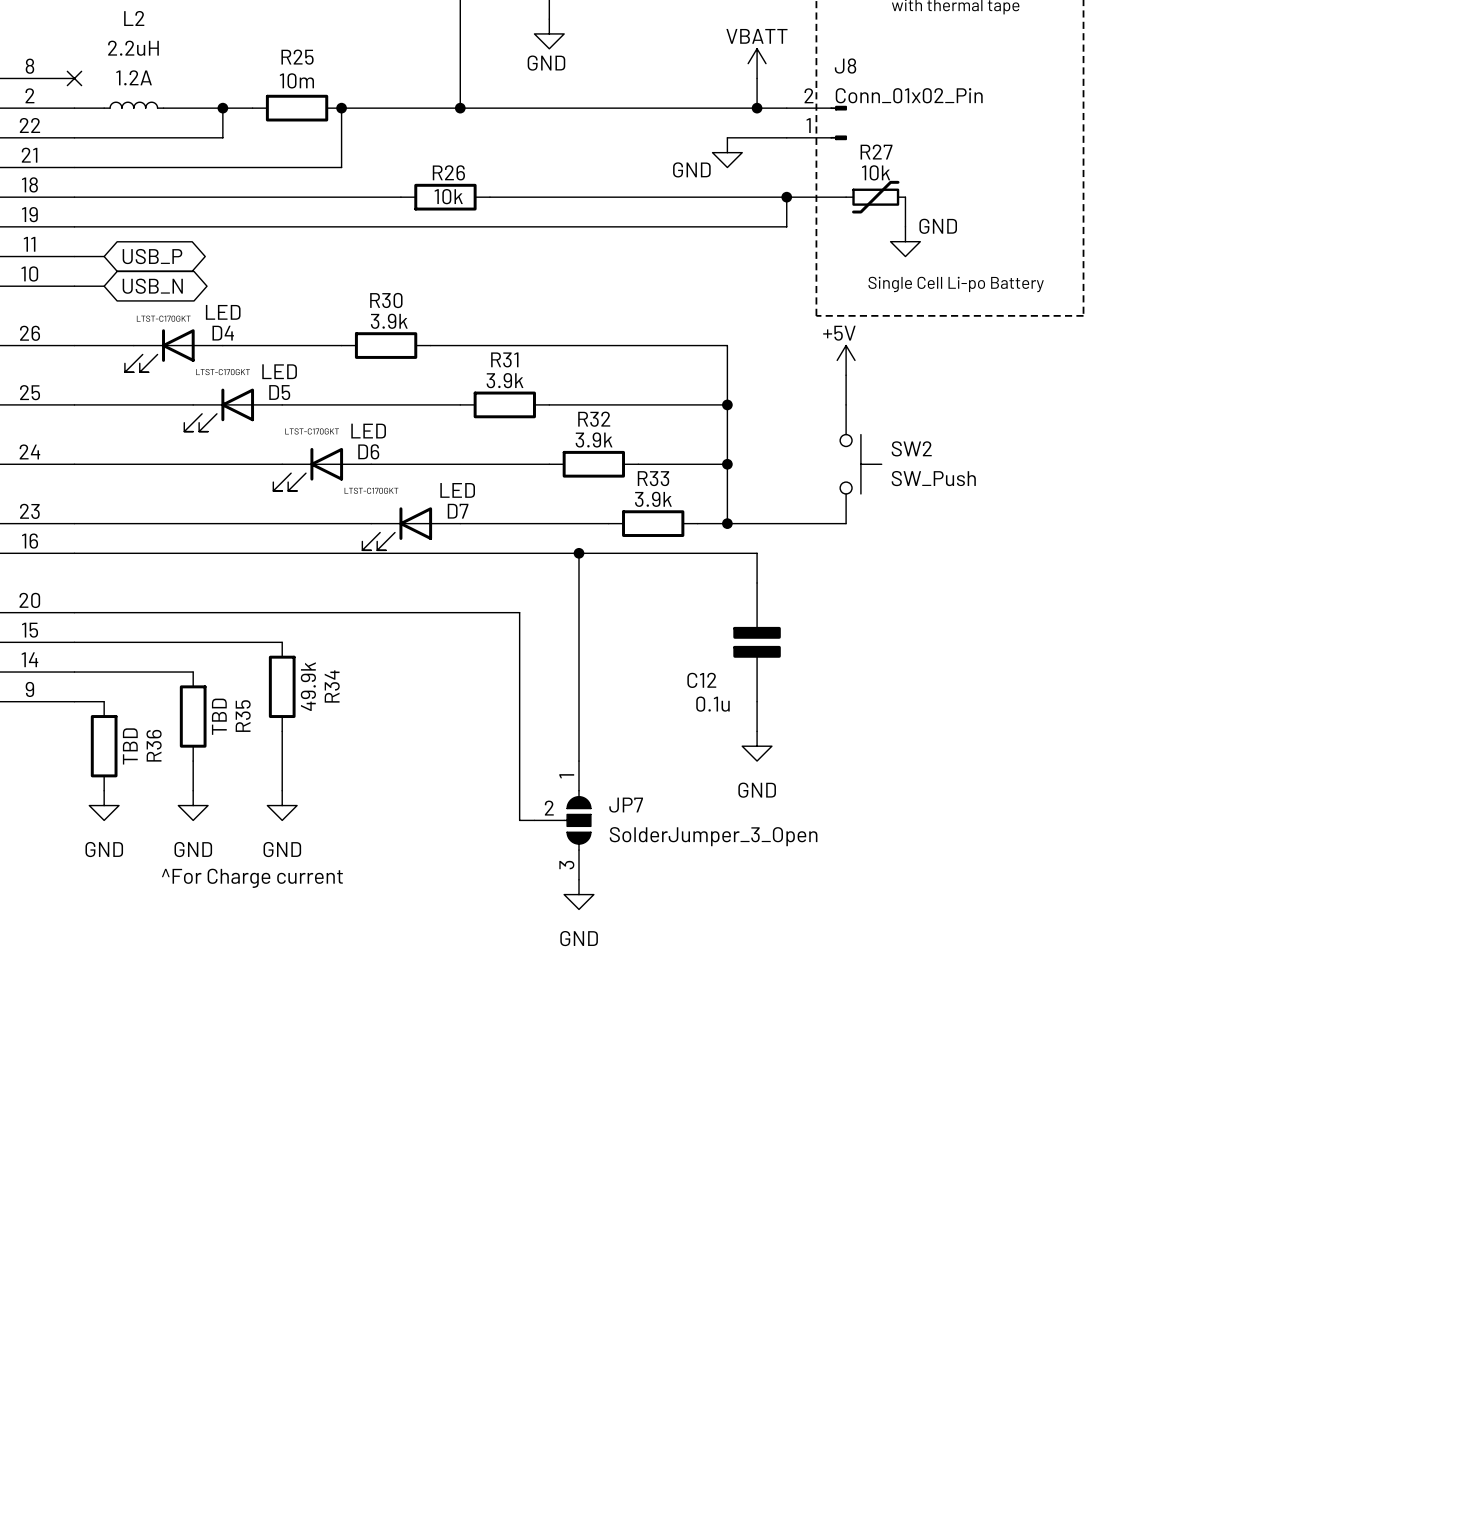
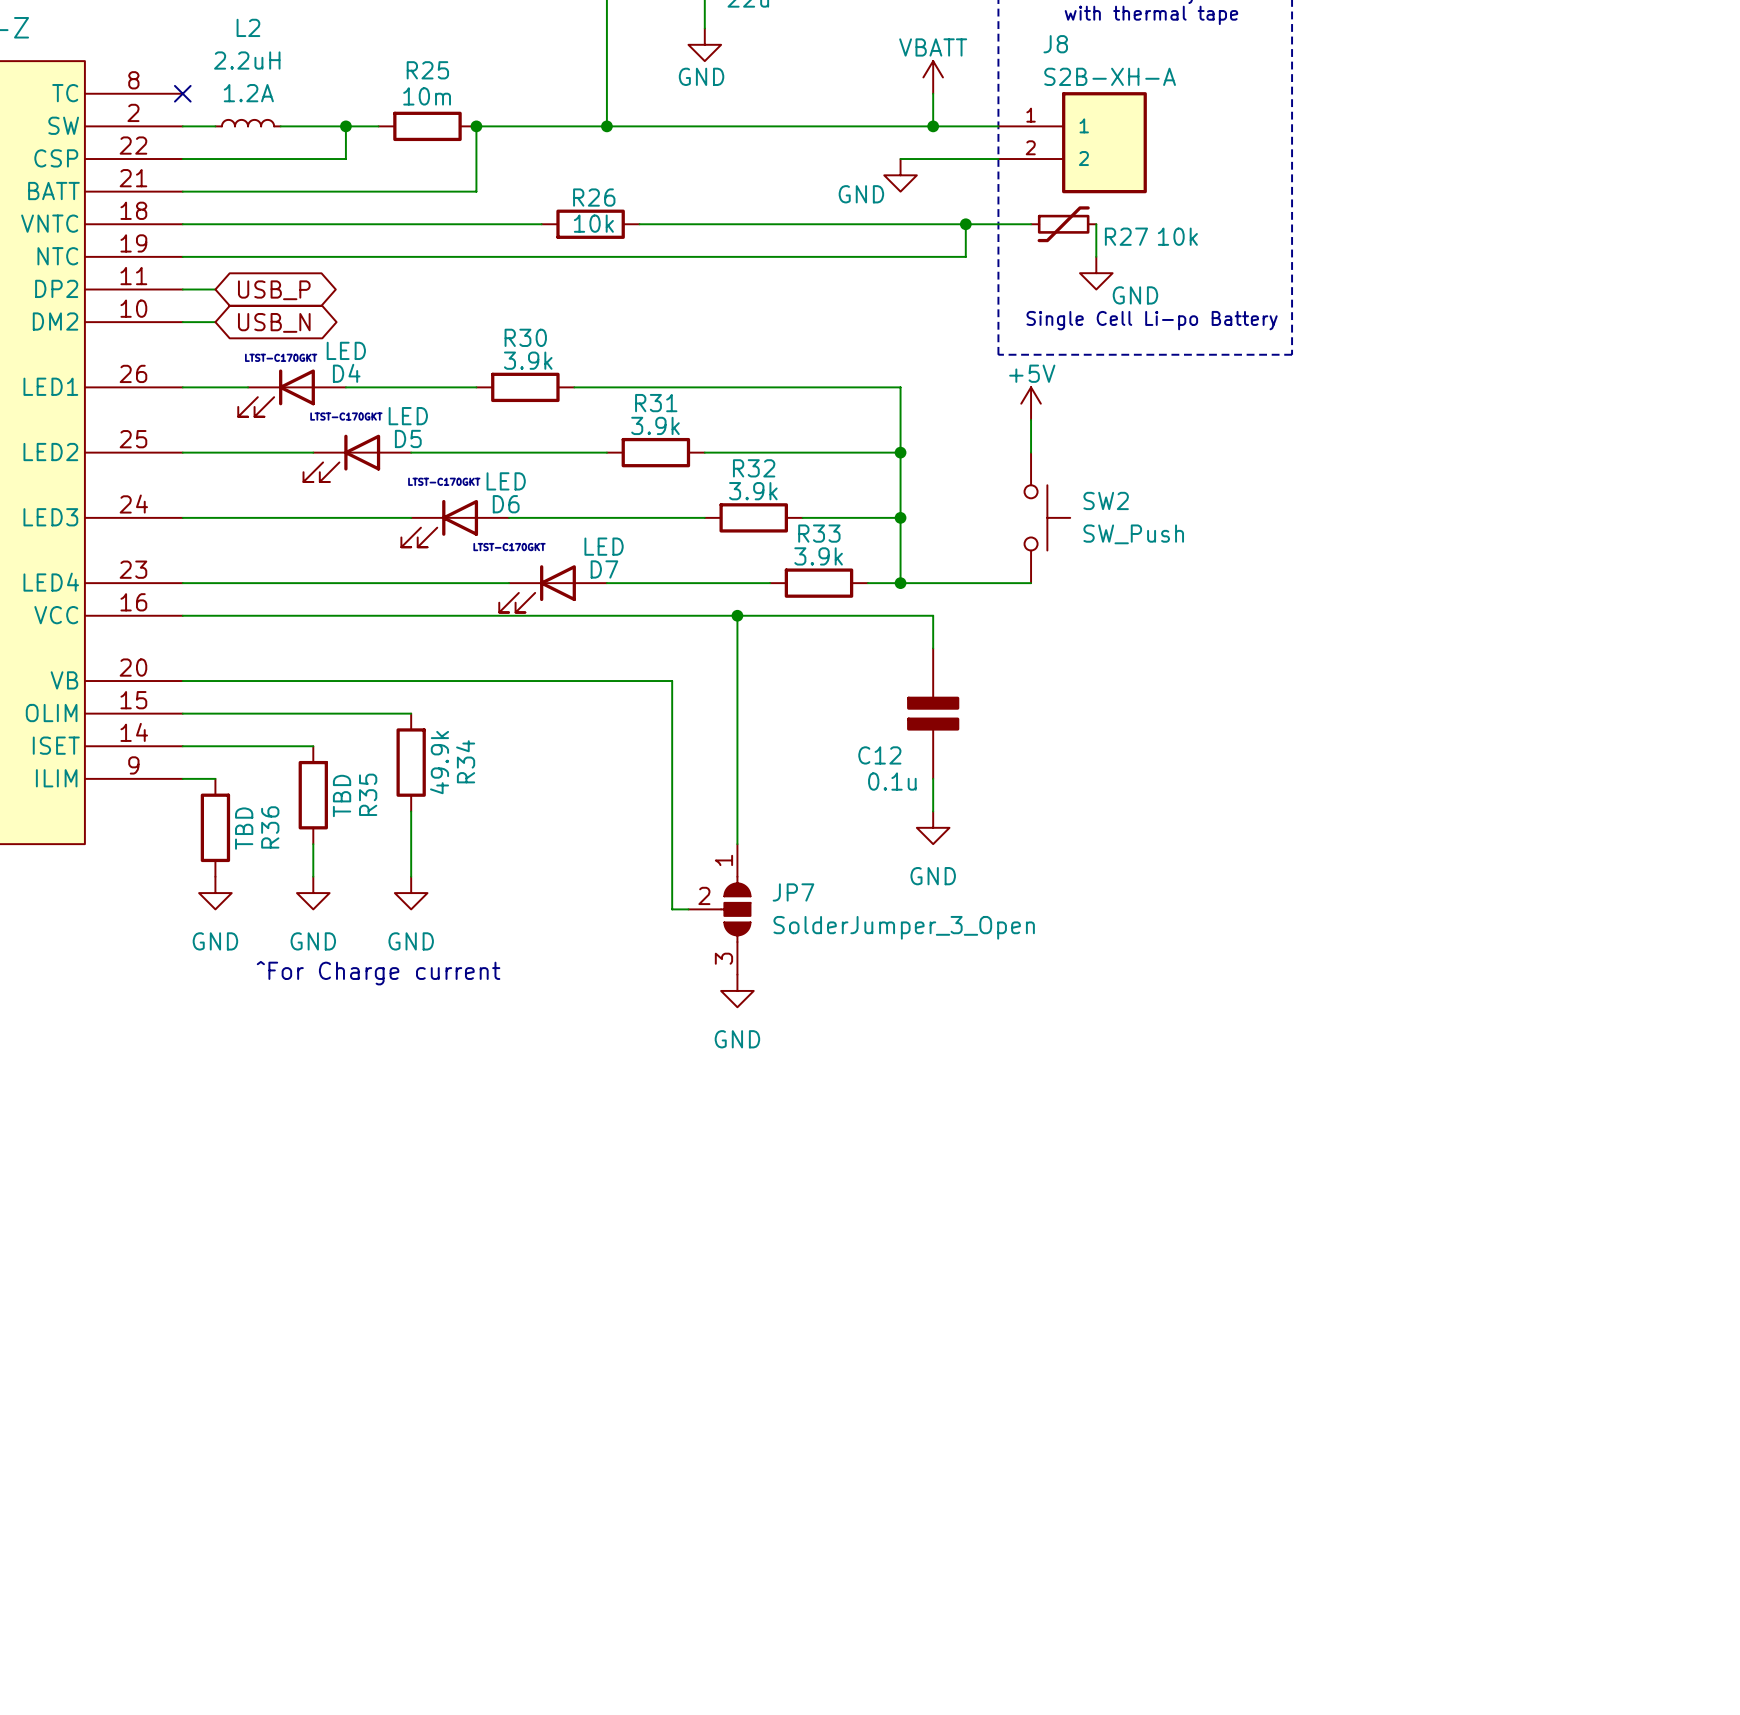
J8 name position: J8 (845, 66) -> J8 (1055, 44)
J8 value: Conn_01x02_Pin (909, 95) -> S2B-XH-A (1110, 76)
J8 symbol: [786, 105, 847, 141] -> [998, 92, 1147, 194]
R27 name position: R27 (876, 152) -> R27 (1126, 236)
R27 value position: 10k (876, 172) -> 10k (1177, 236)
power symbol text position: GND (938, 226) -> GND (1135, 295)

